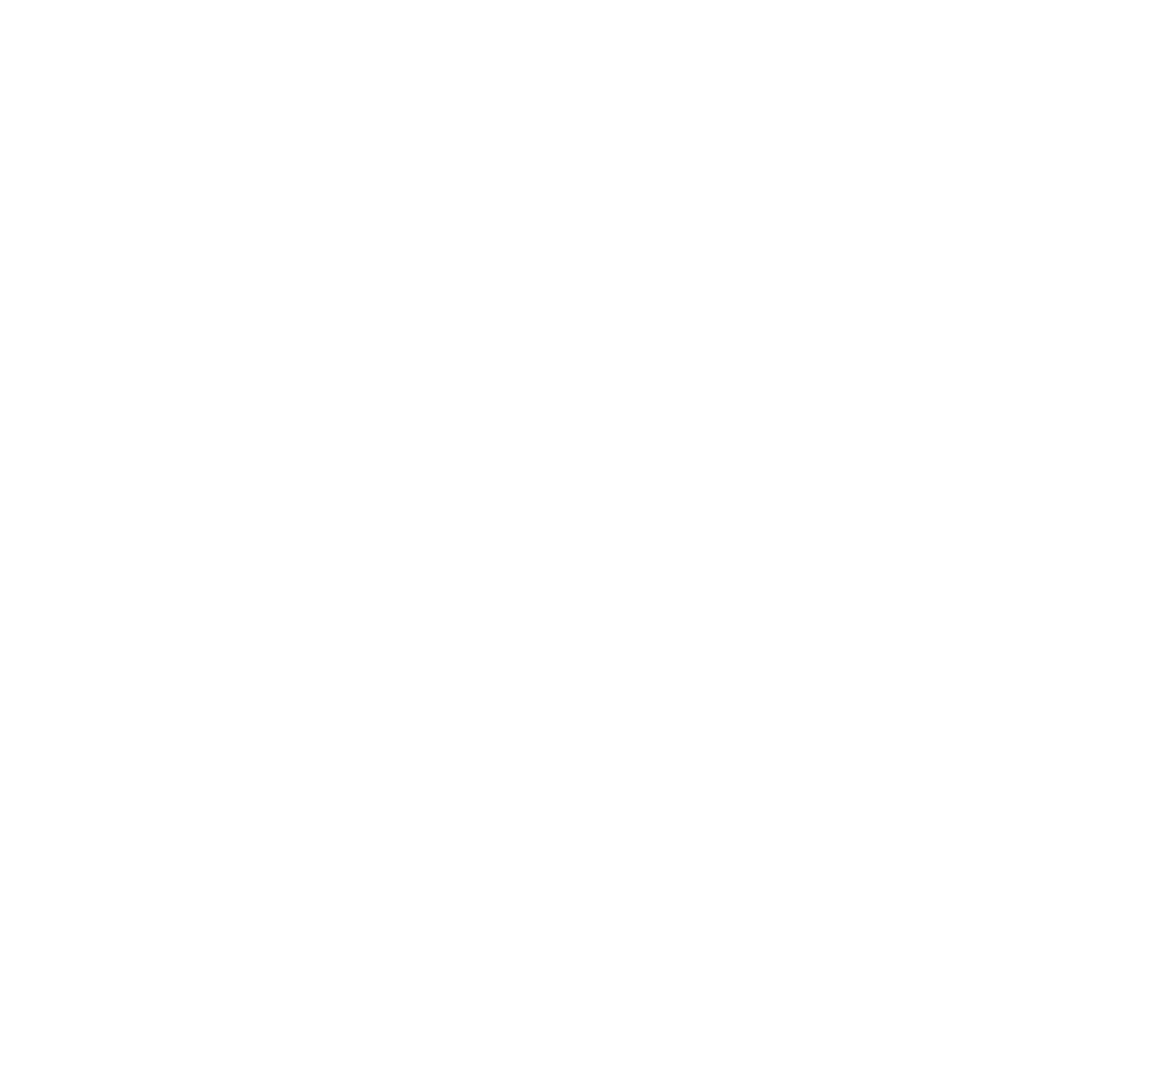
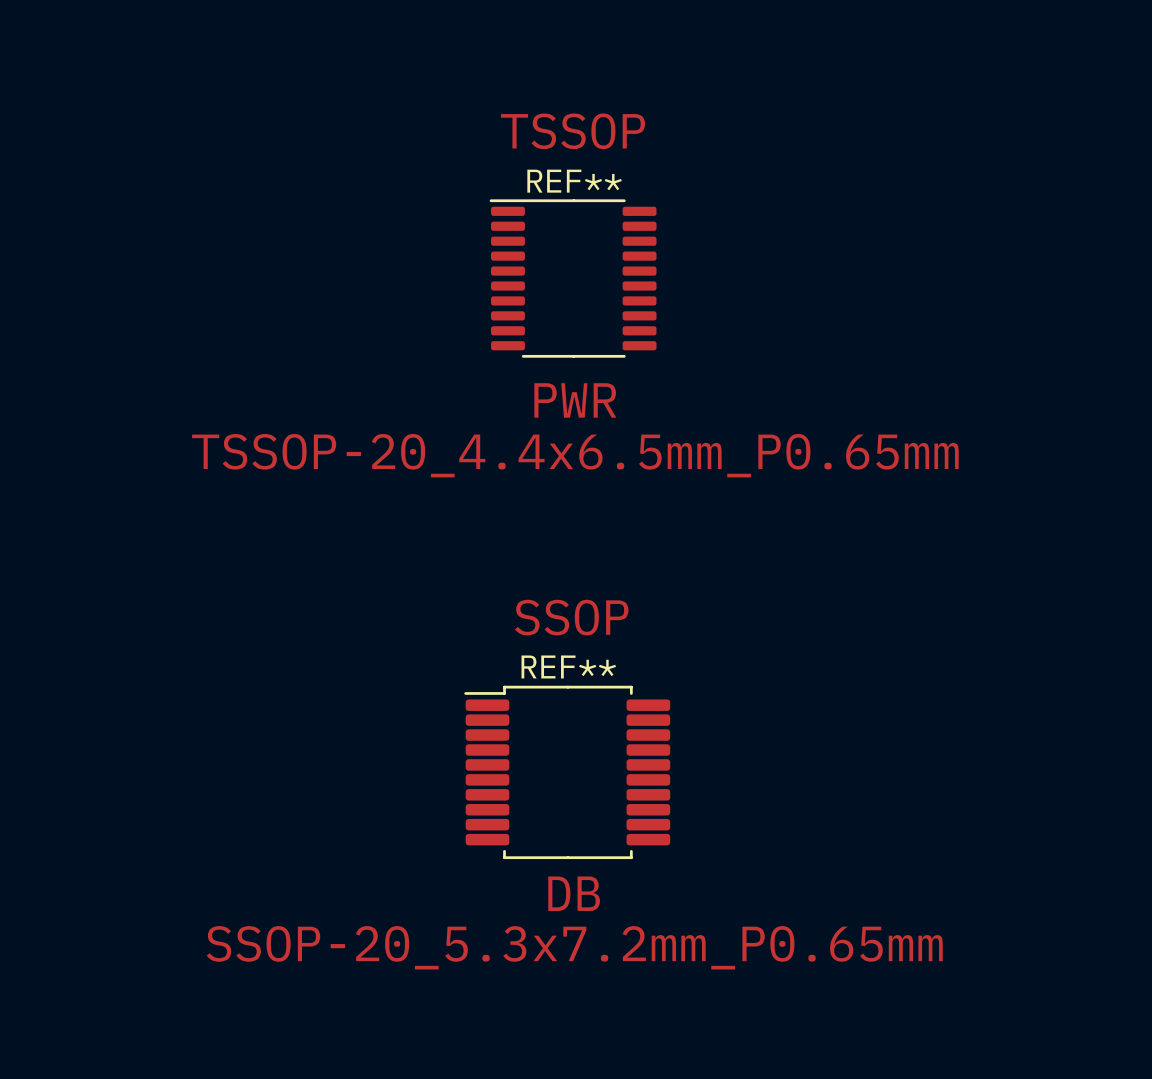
text: none -> TSSOP (572, 131)
REF**: none -> (573, 278)
text: none -> PWR (575, 400)
text: none -> TSSOP-20_4.4x6.5mm_P0.65mm (575, 455)
text: none -> SSOP (571, 617)
REF**: none -> (567, 772)
text: none -> DB (574, 893)
text: none -> SSOP-20_5.3x7.2mm_P0.65mm (574, 947)

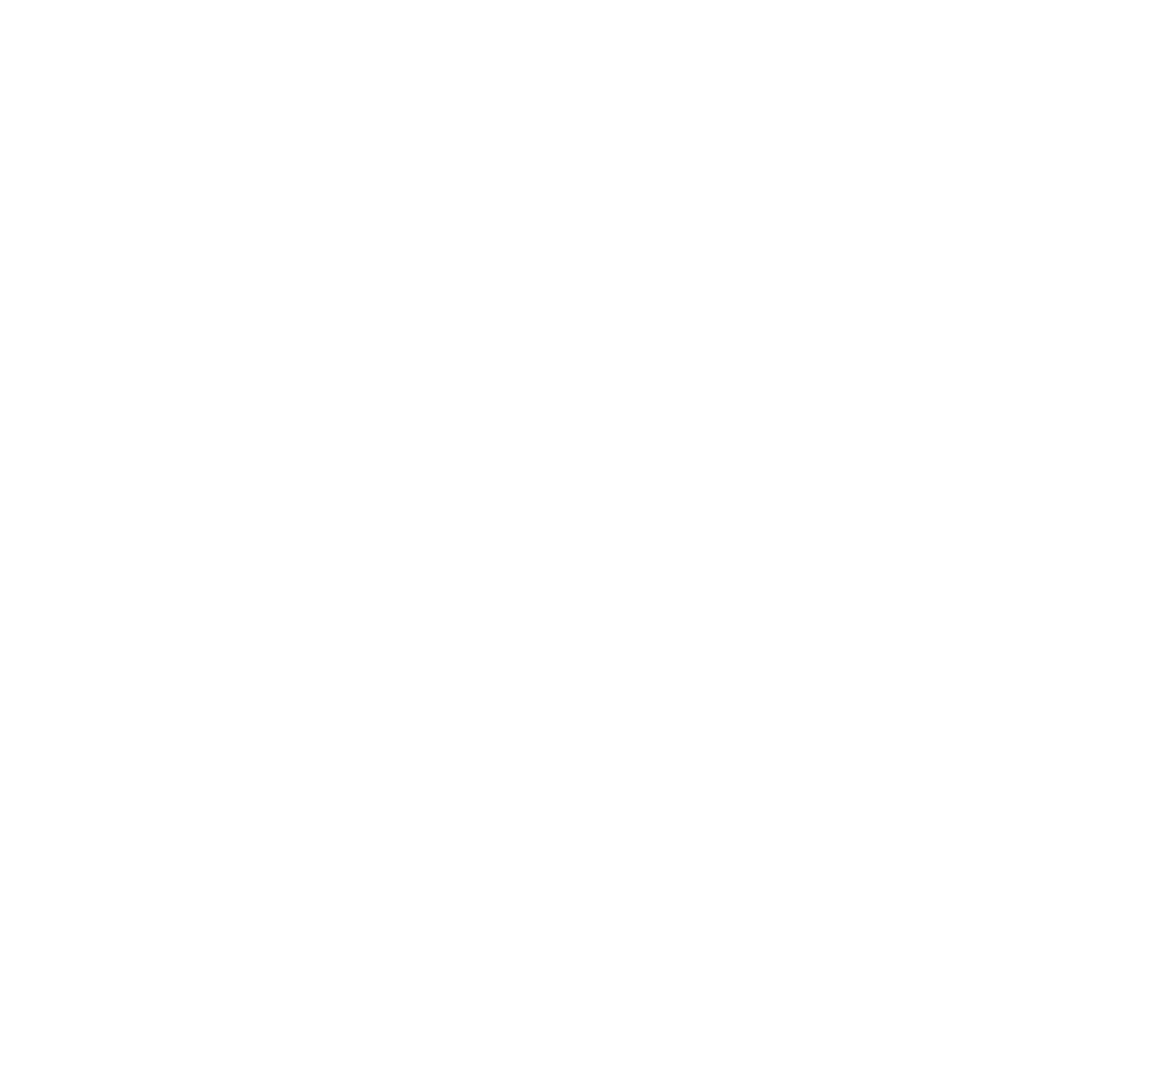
text: TSSOP (572, 131) -> none
REF**: (573, 278) -> none
text: PWR (575, 400) -> none
text: TSSOP-20_4.4x6.5mm_P0.65mm (575, 455) -> none
text: SSOP (571, 617) -> none
REF**: (567, 772) -> none
text: DB (574, 893) -> none
text: SSOP-20_5.3x7.2mm_P0.65mm (574, 947) -> none

